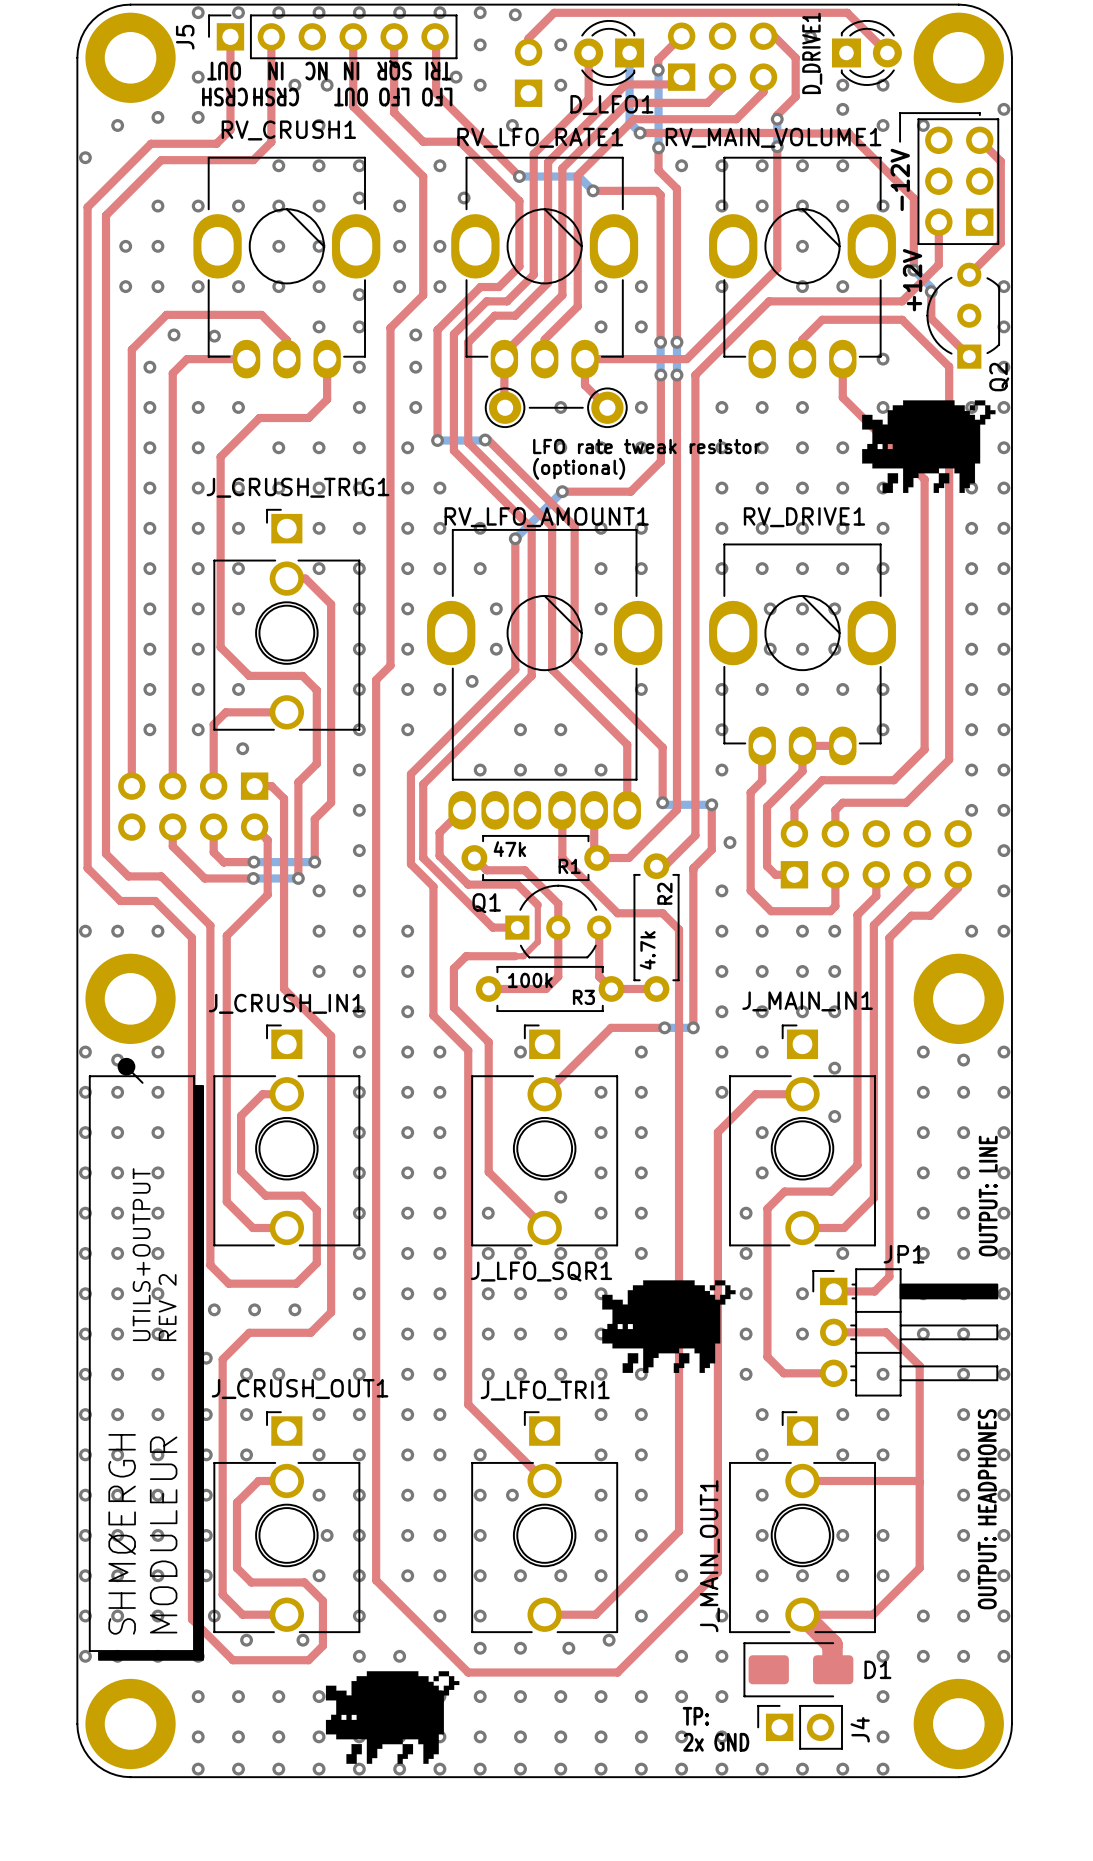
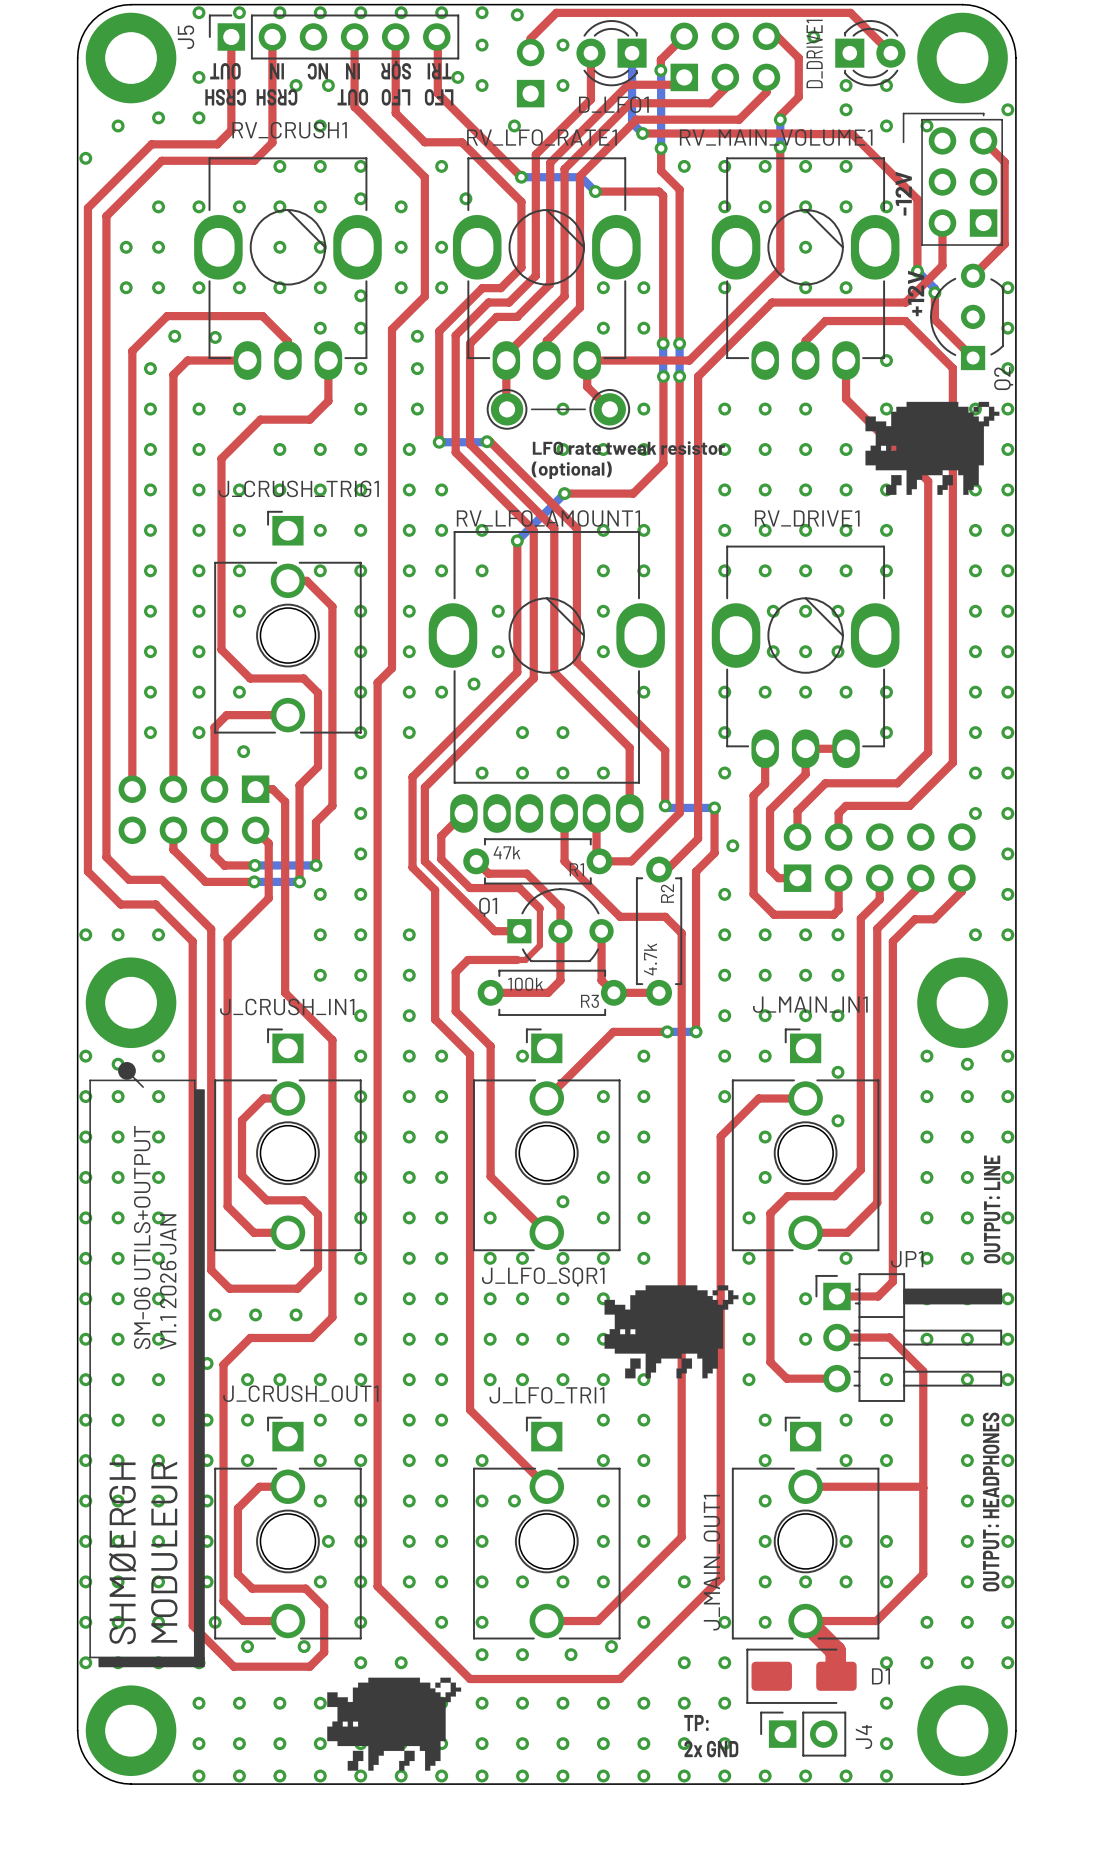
text: UTILS+OUTPUT (141, 1254) -> SM-06 UTILS+OUTPUT (142, 1237)
text: REV 2 (167, 1307) -> V1.1 2026 JAN (168, 1281)

